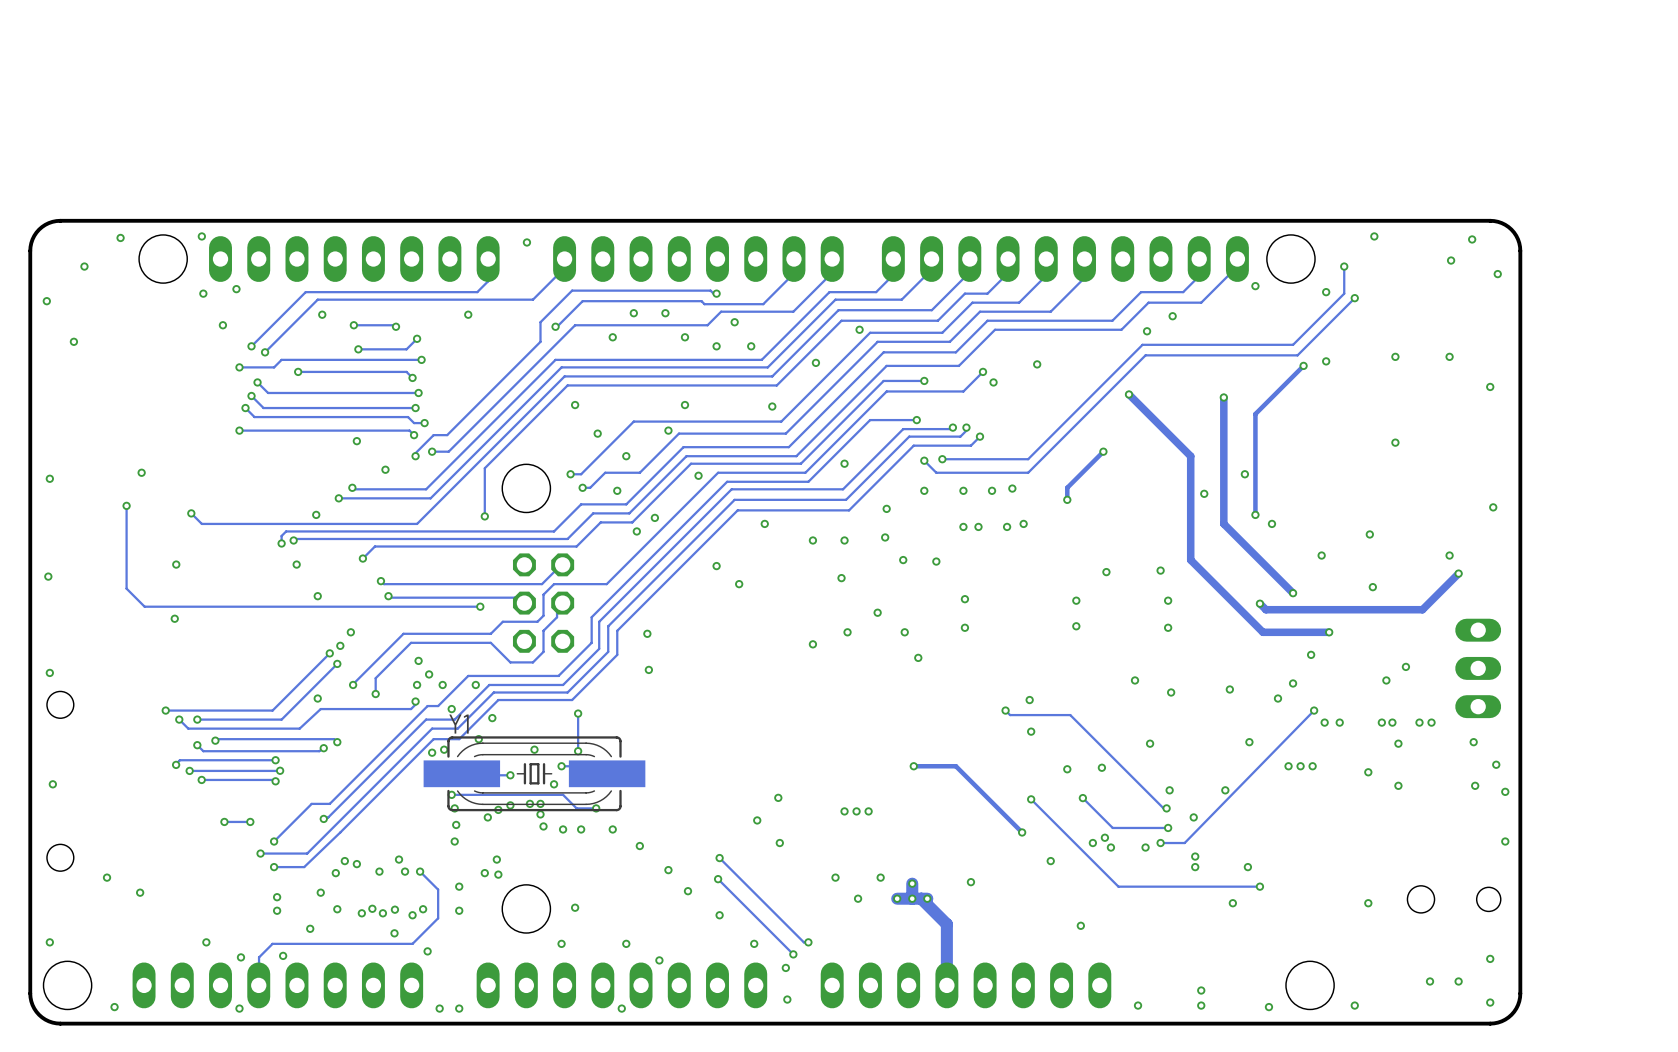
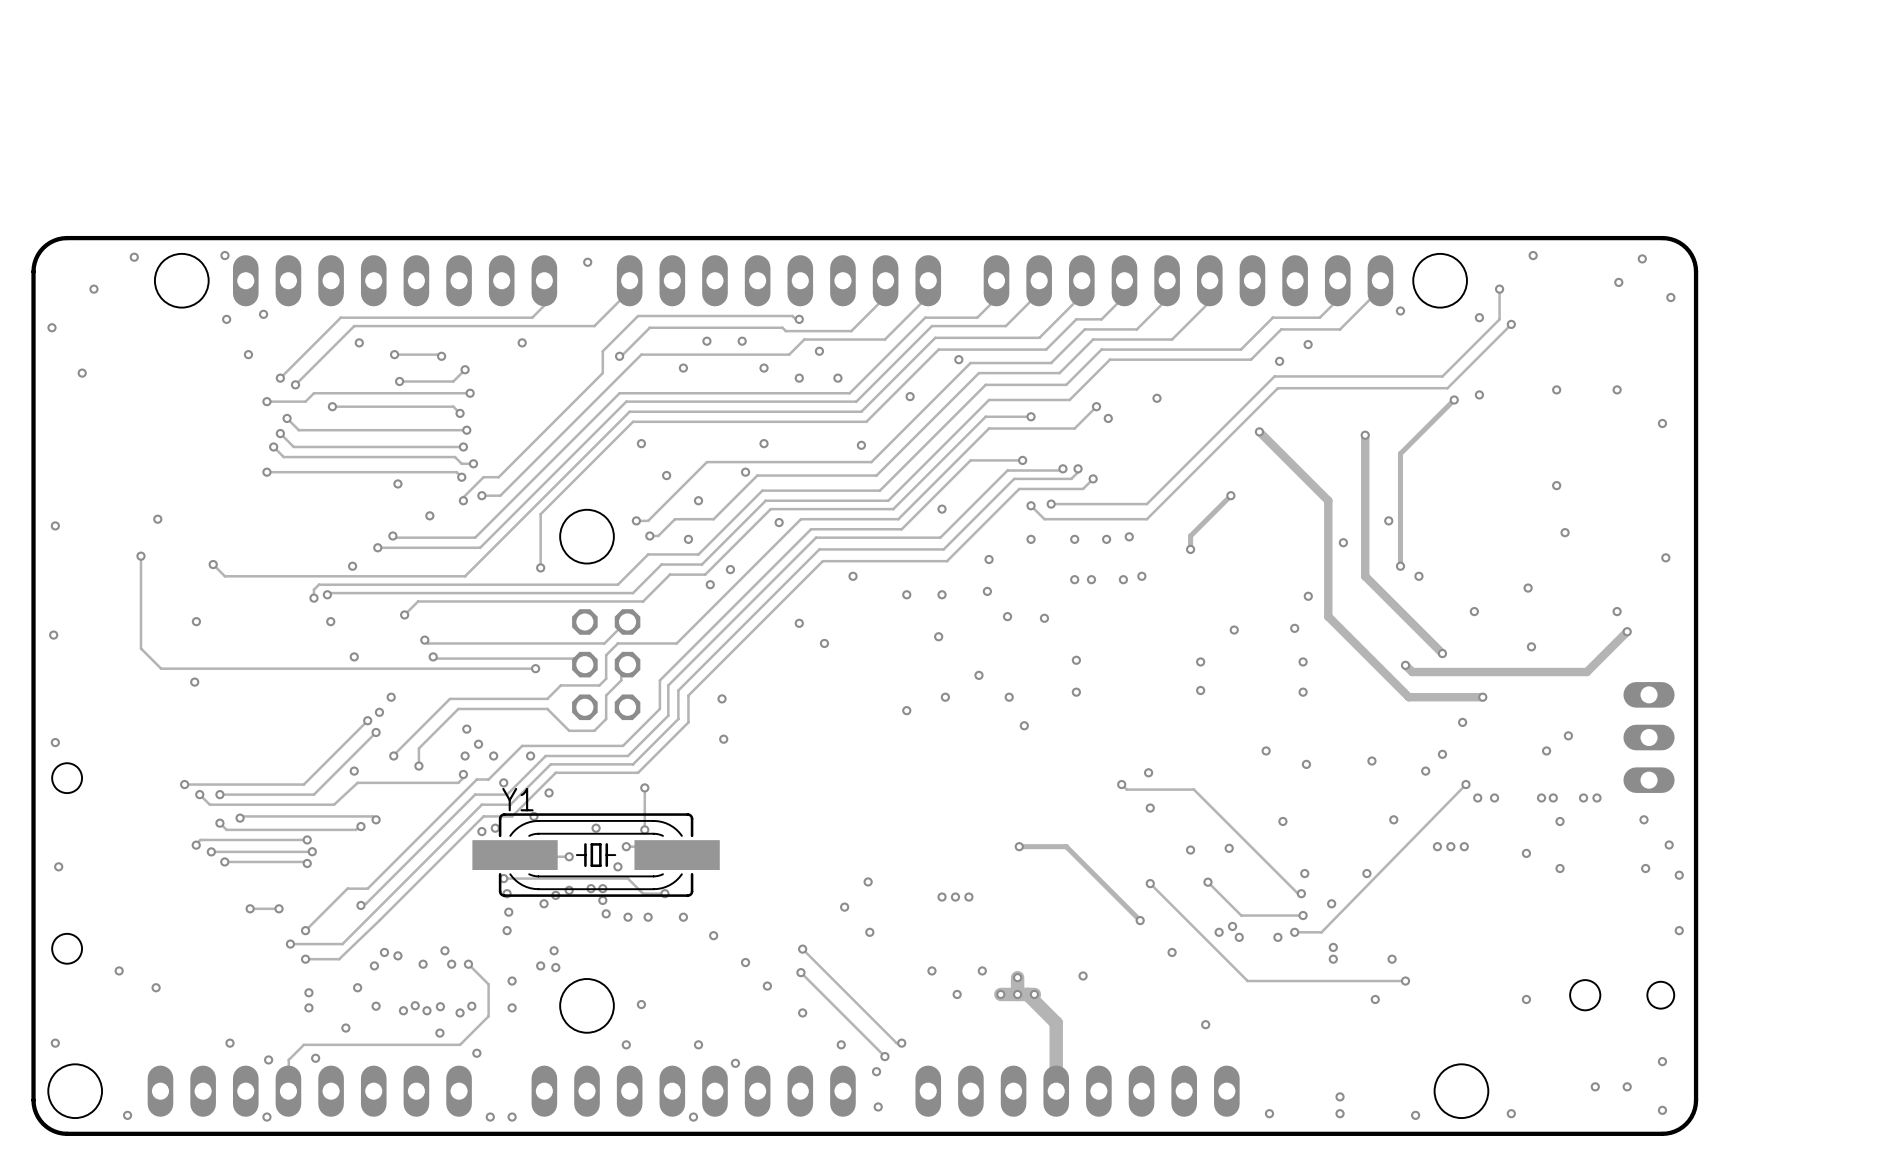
via: none -> (1565, 532)
via: none -> (1308, 596)

